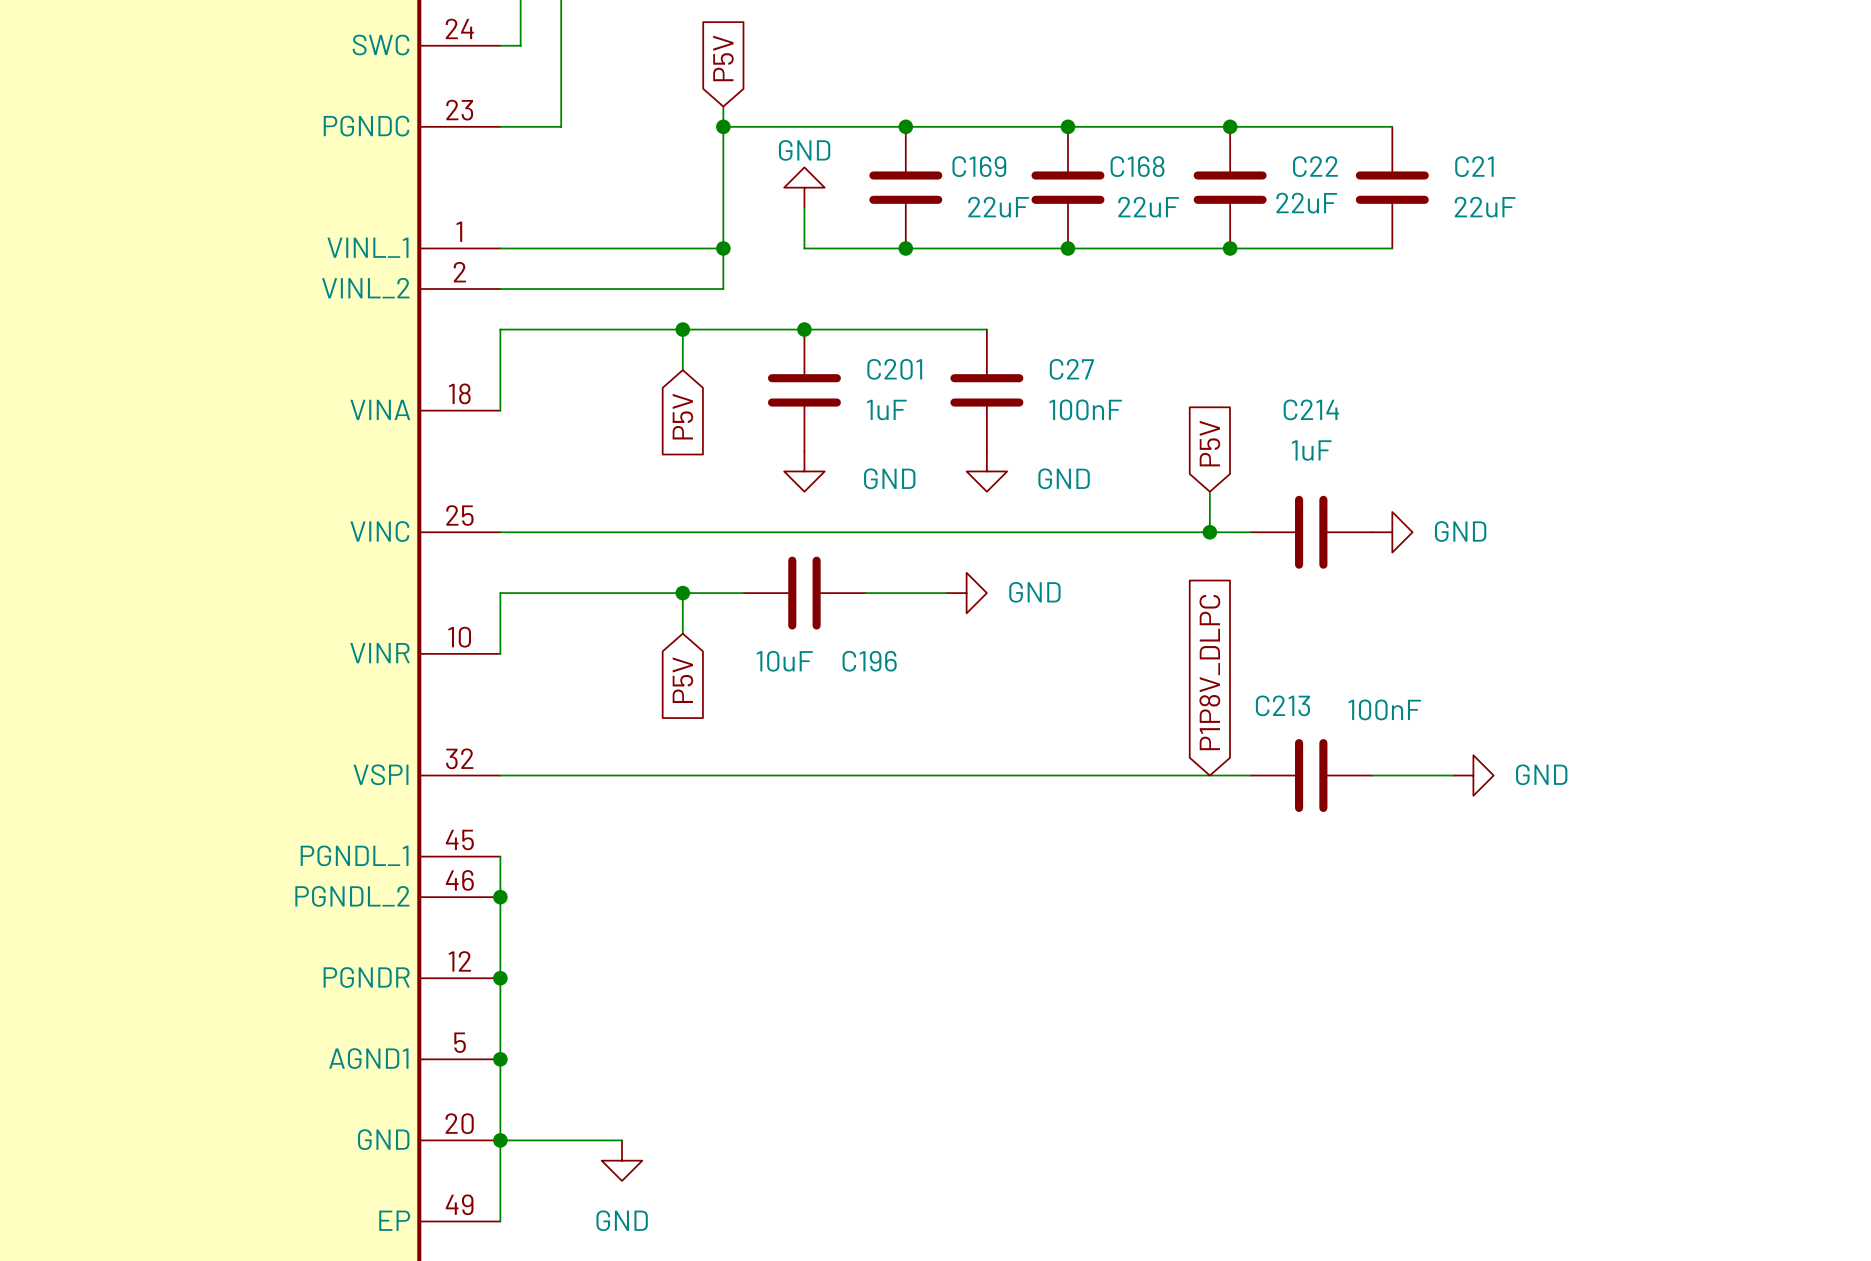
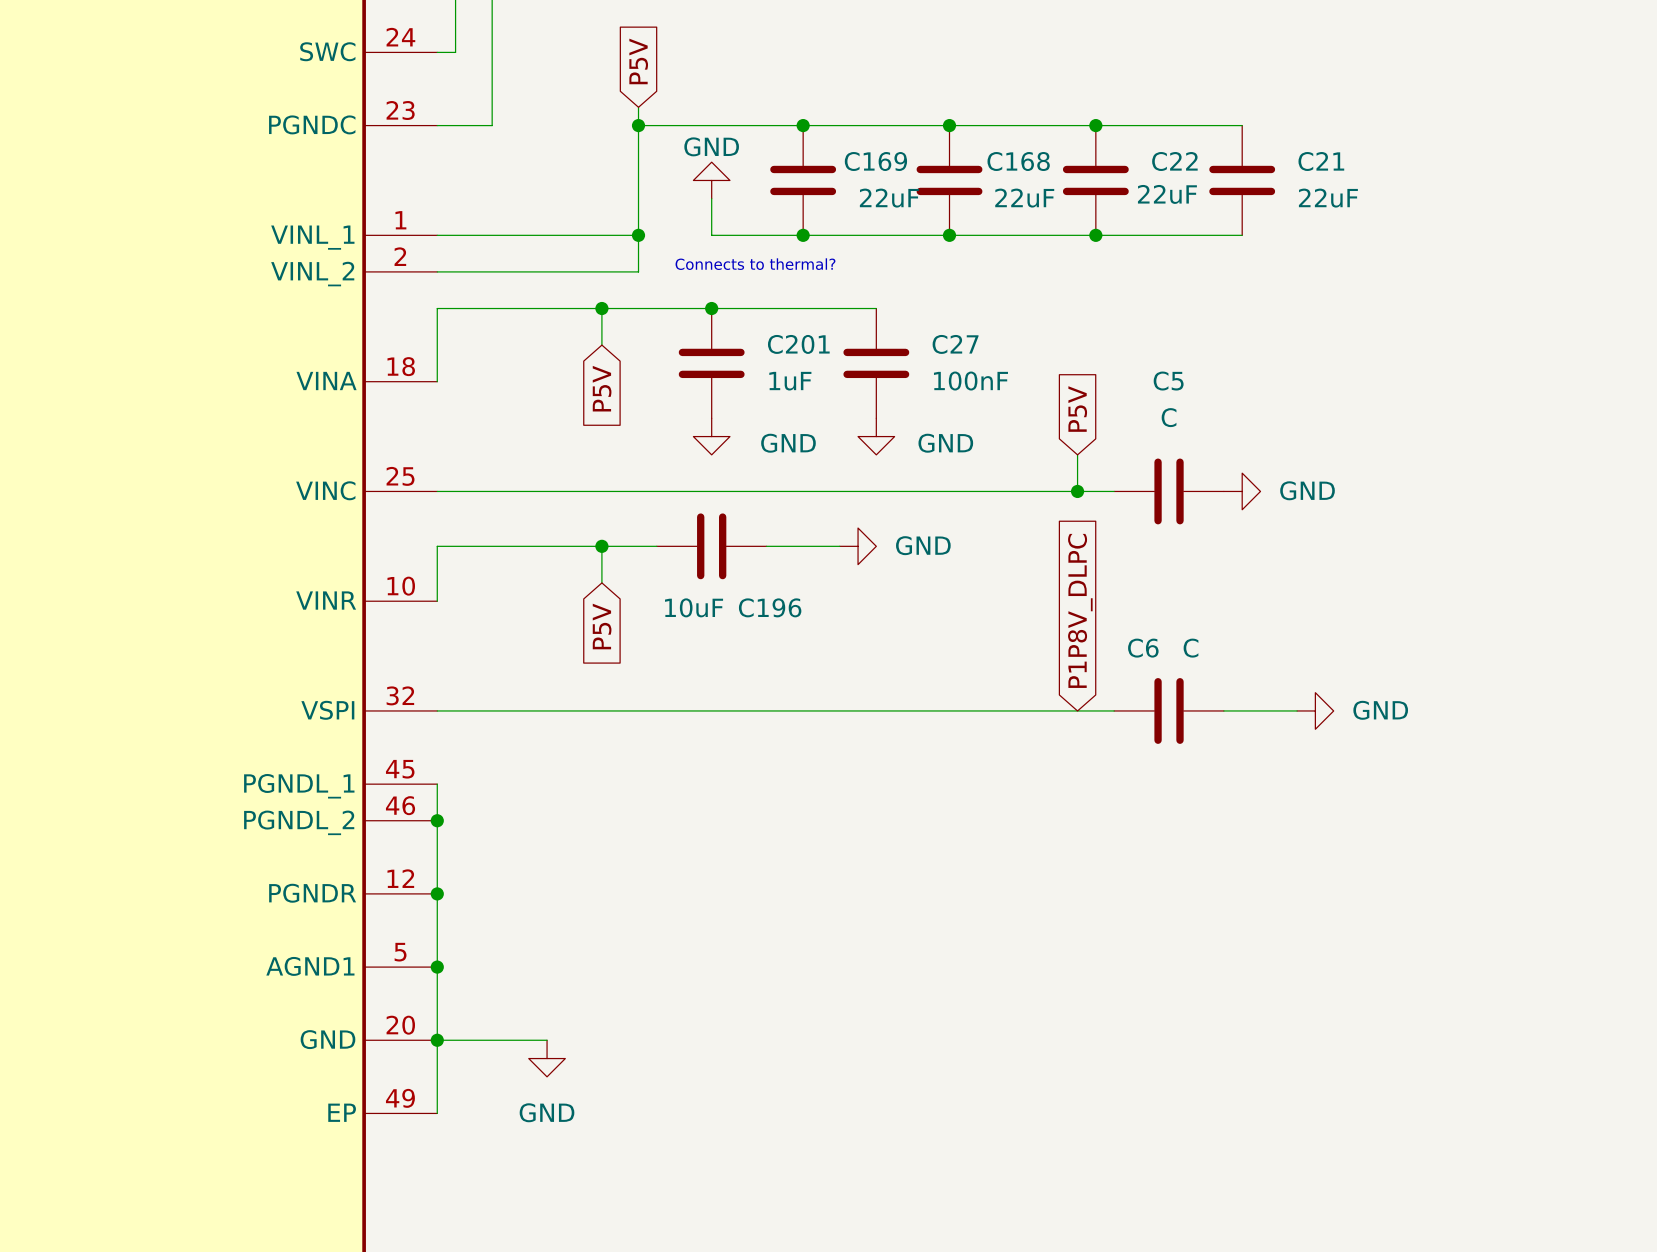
text: none -> Connects to thermal? (755, 264)
C214 name: C214 (1311, 409) -> C5 (1168, 381)
C214 value: 1uF (1311, 450) -> C (1169, 417)
C213 name: C213 (1282, 705) -> C6 (1143, 648)
C213 value: 100nF (1384, 709) -> C (1191, 648)

